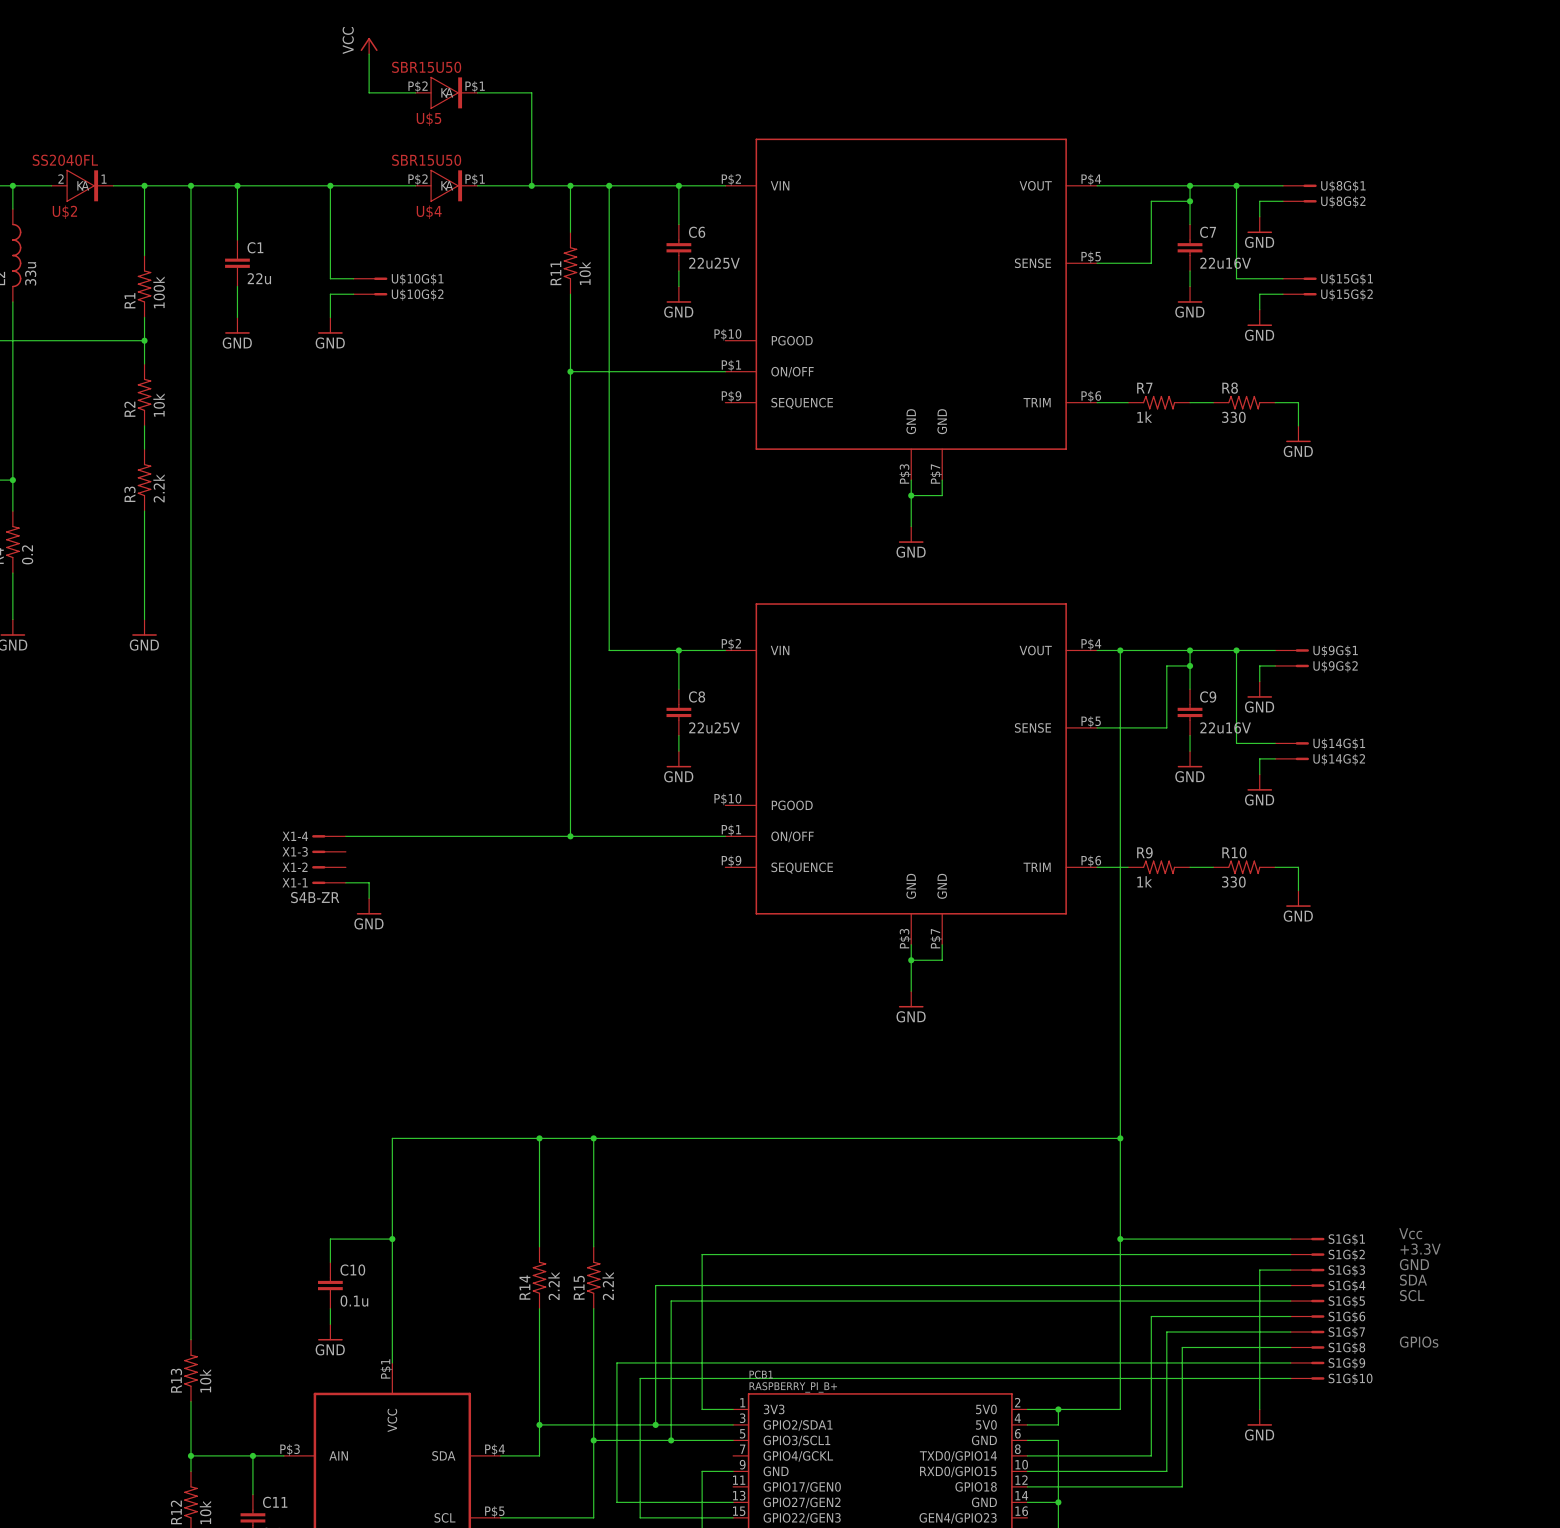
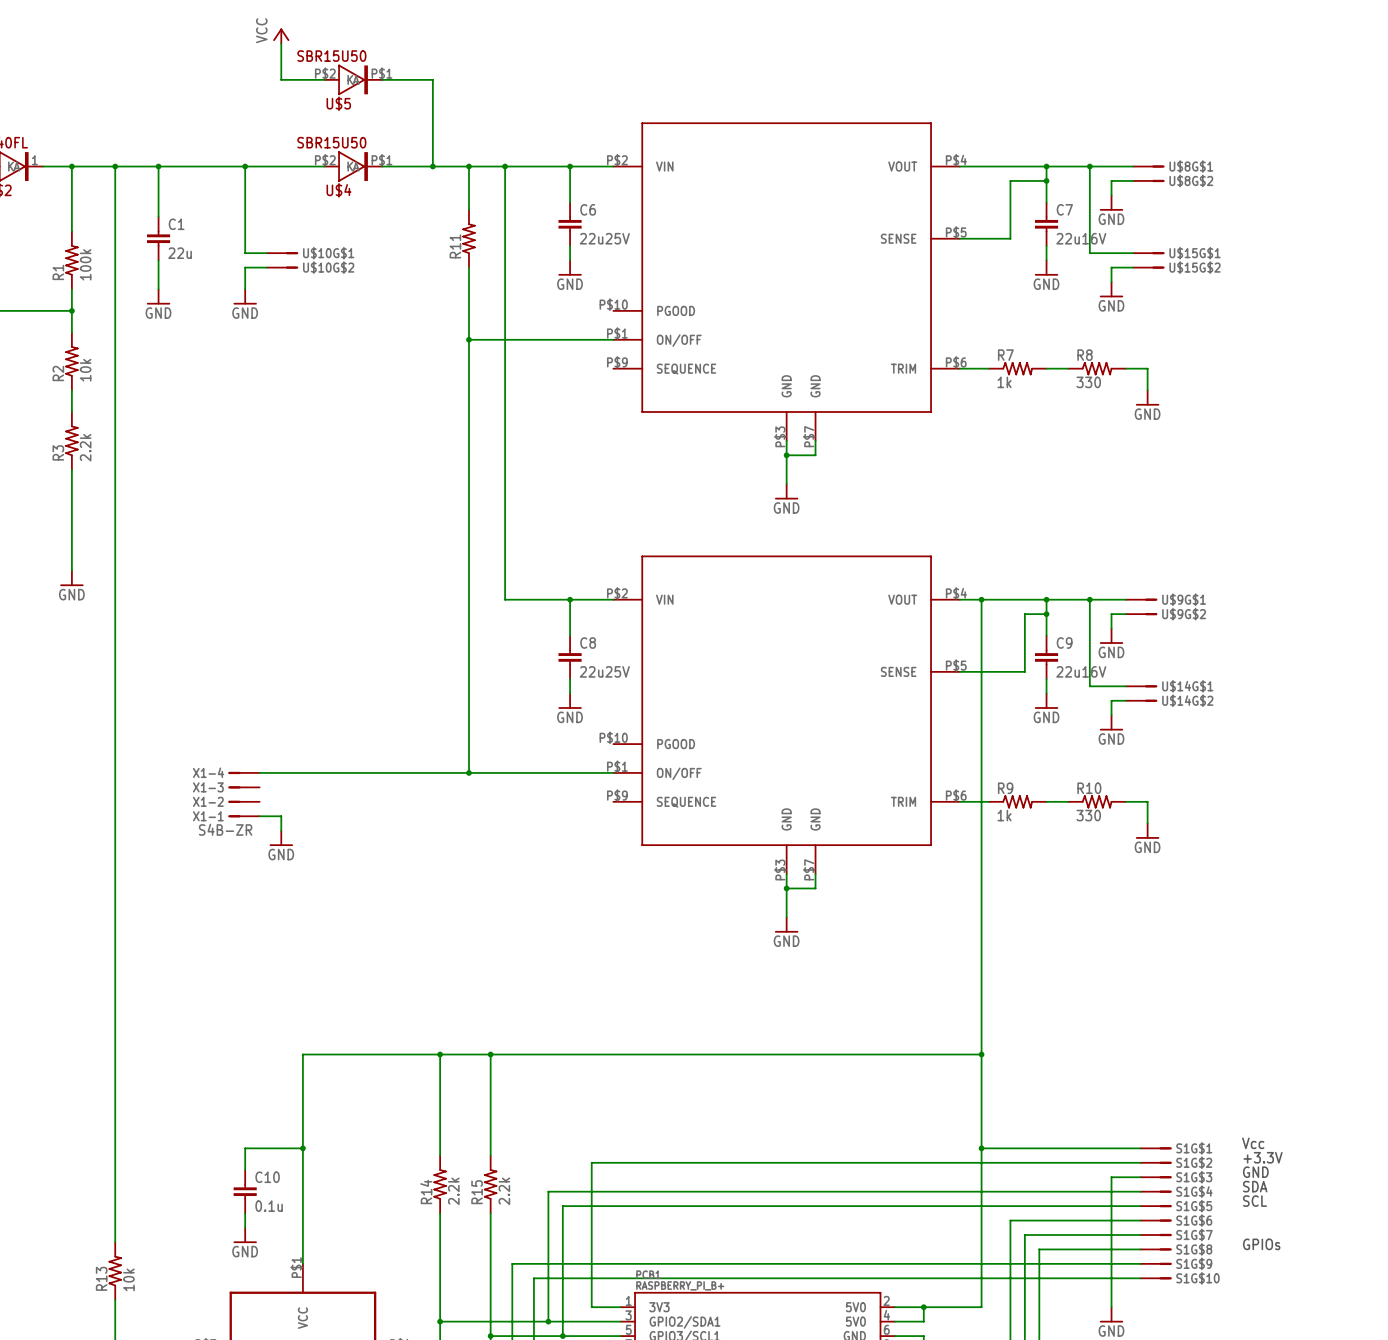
R11 value: 10k (585, 273) -> none

